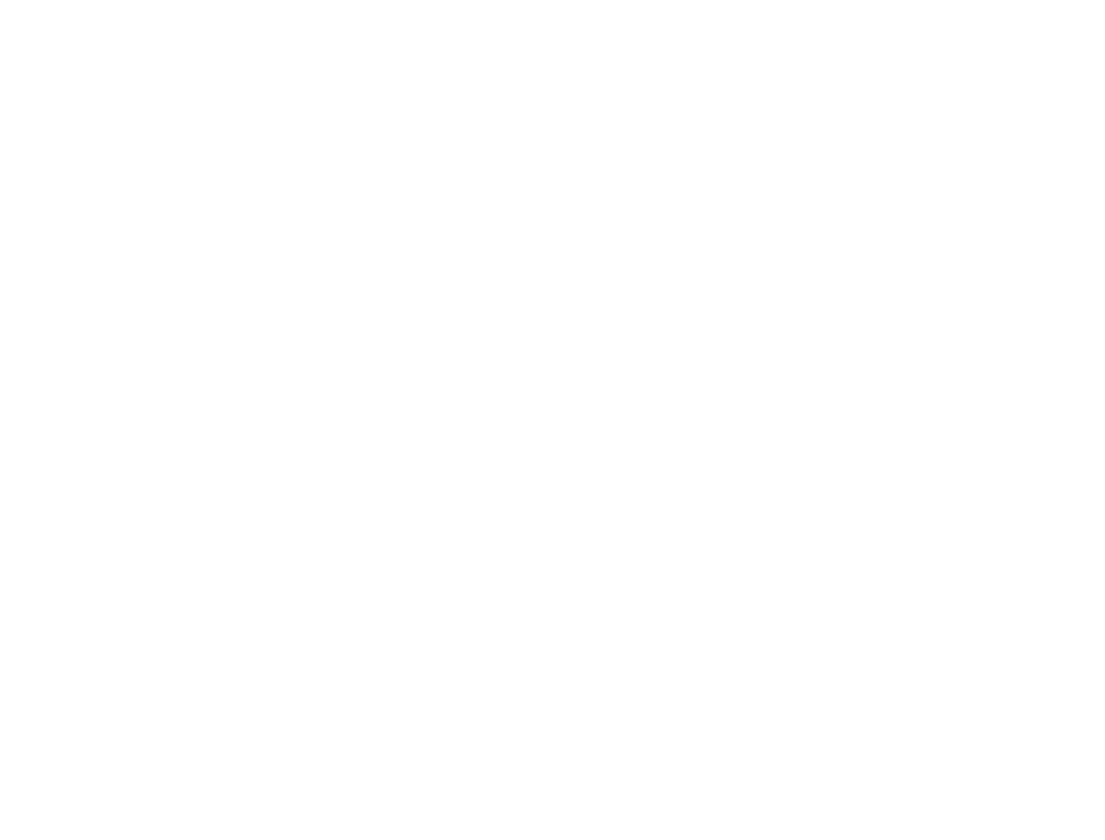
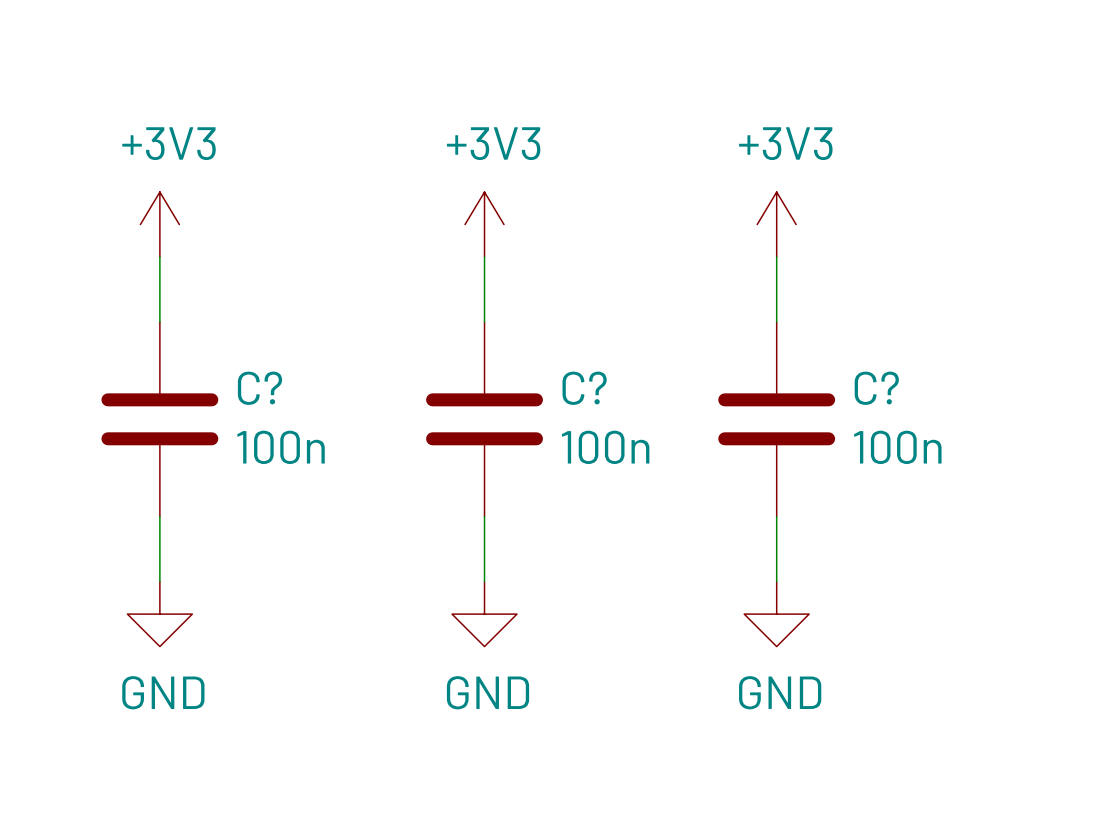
power symbol: none -> +3V3 (159, 224)
power symbol: none -> +3V3 (484, 224)
power symbol: none -> +3V3 (776, 224)
wire: none -> (159, 257) (159, 321)
wire: none -> (484, 257) (484, 321)
wire: none -> (776, 257) (776, 321)
C?: none -> 100n (159, 419)
C?: none -> 100n (484, 419)
C?: none -> 100n (776, 419)
wire: none -> (159, 516) (159, 581)
wire: none -> (484, 516) (484, 581)
wire: none -> (776, 516) (776, 581)
power symbol: none -> GND (159, 614)
power symbol: none -> GND (484, 614)
power symbol: none -> GND (776, 614)

